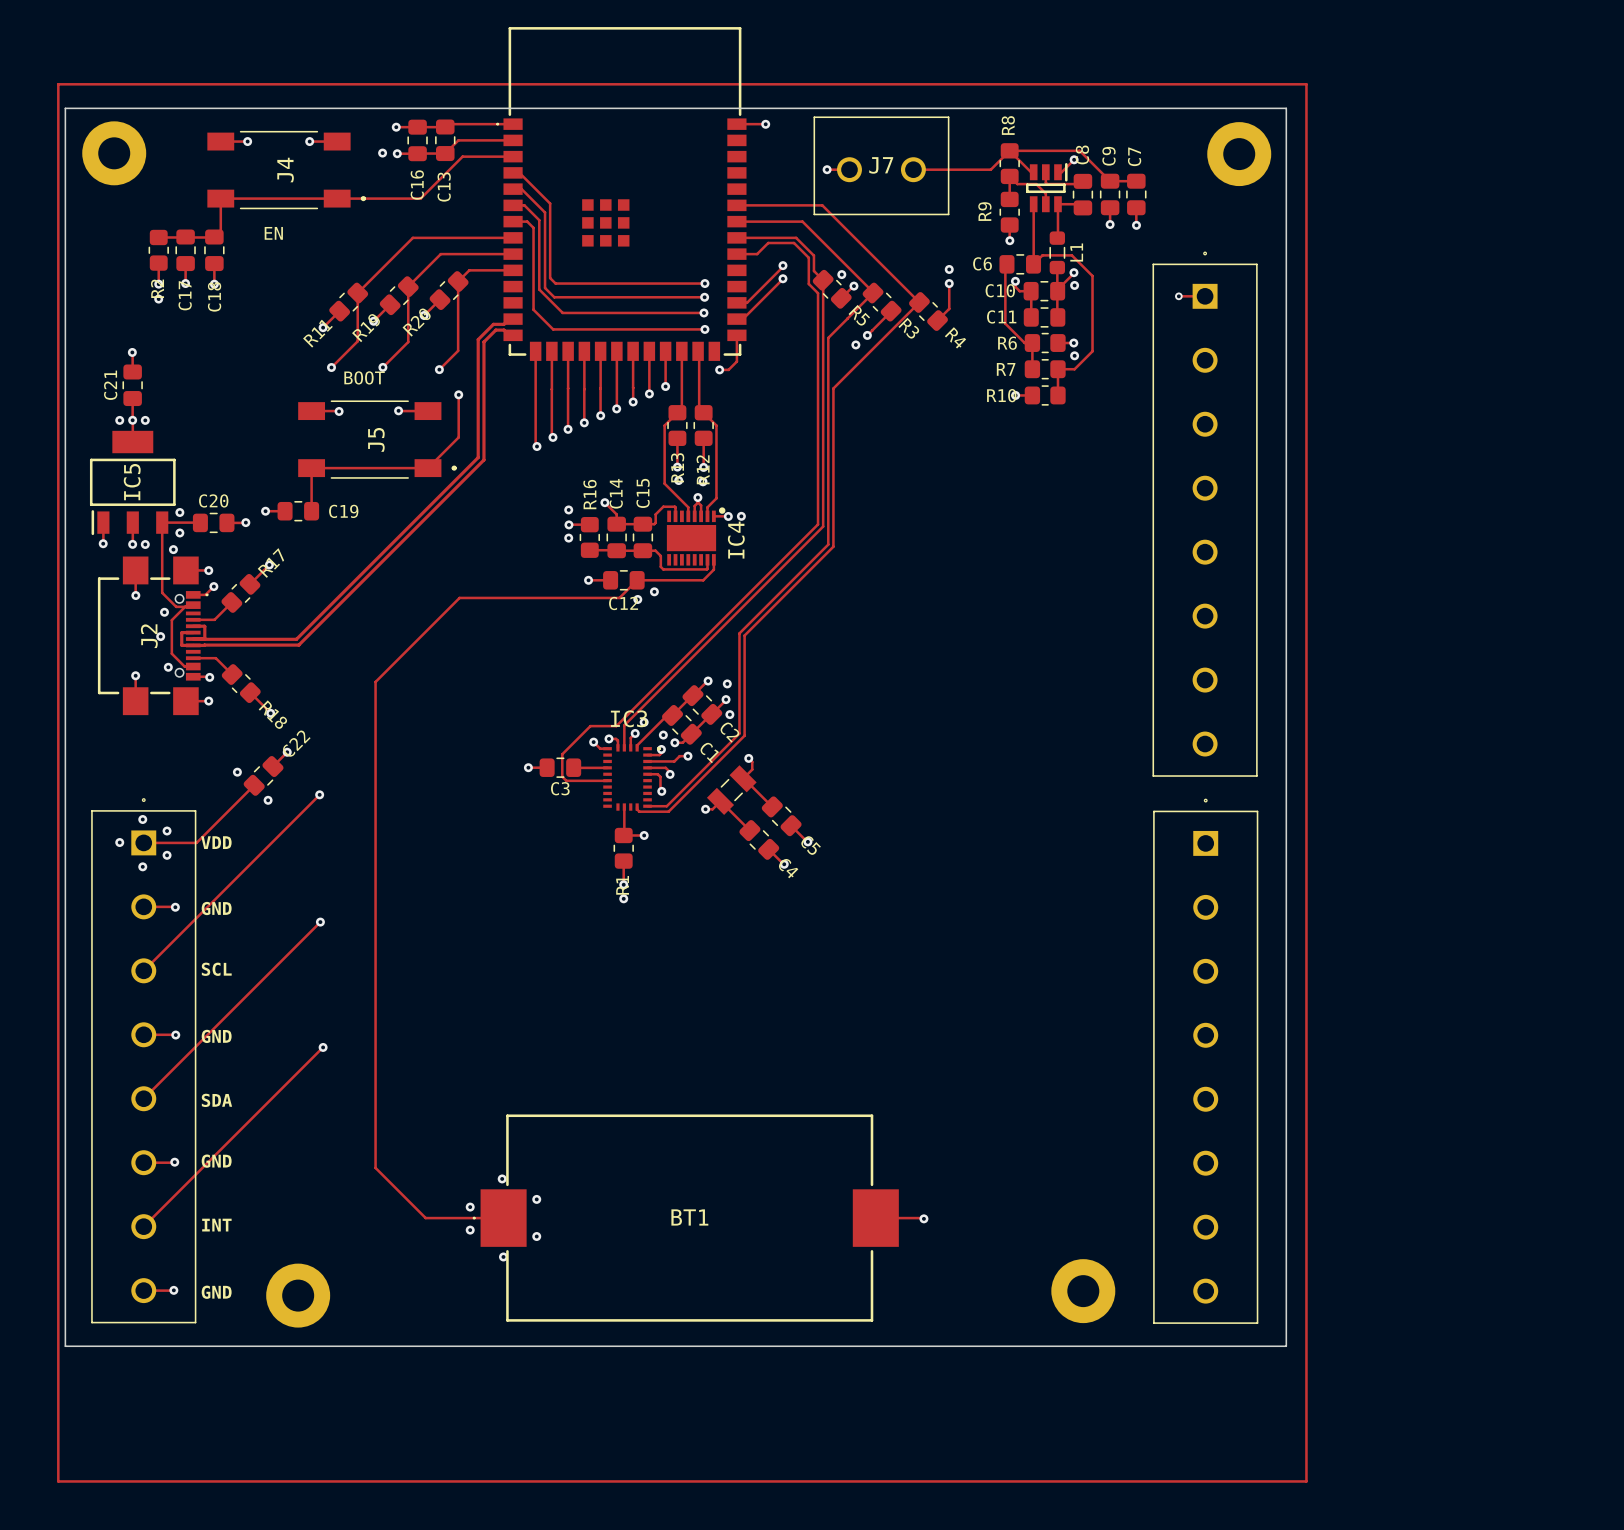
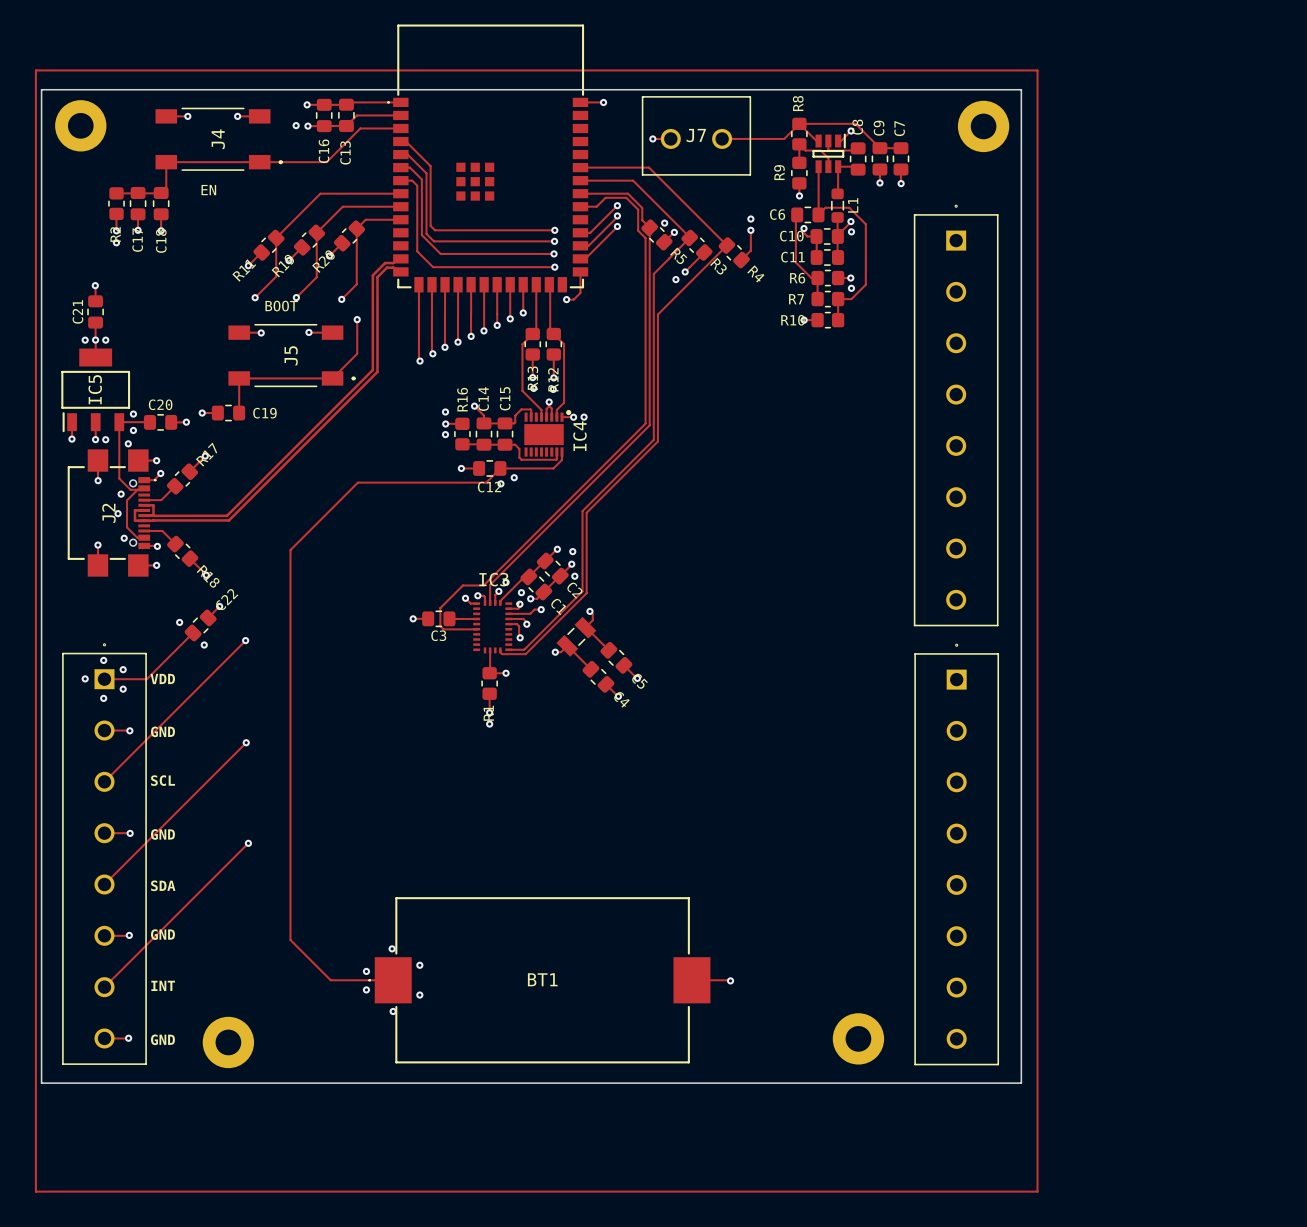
track: none -> (617, 205) (590, 232) (580, 232)
via: none -> (617, 205)
track: (1178, 296) (1205, 296) -> none
via: (1178, 296) -> none

